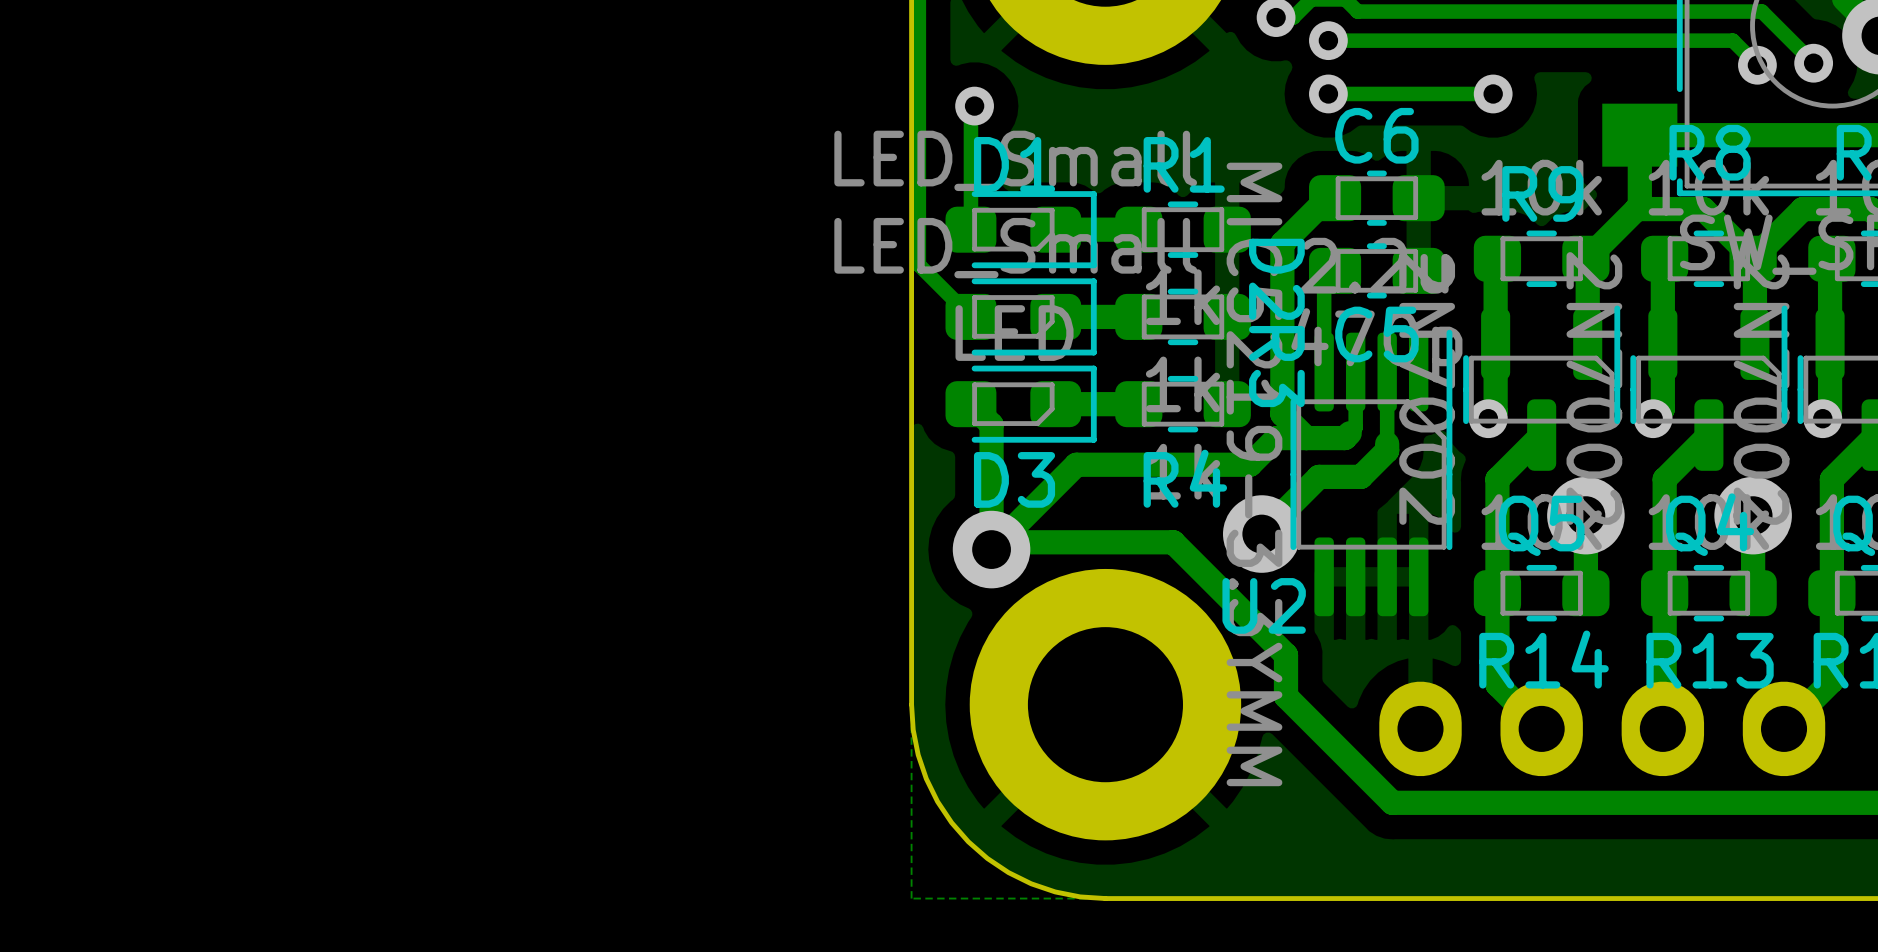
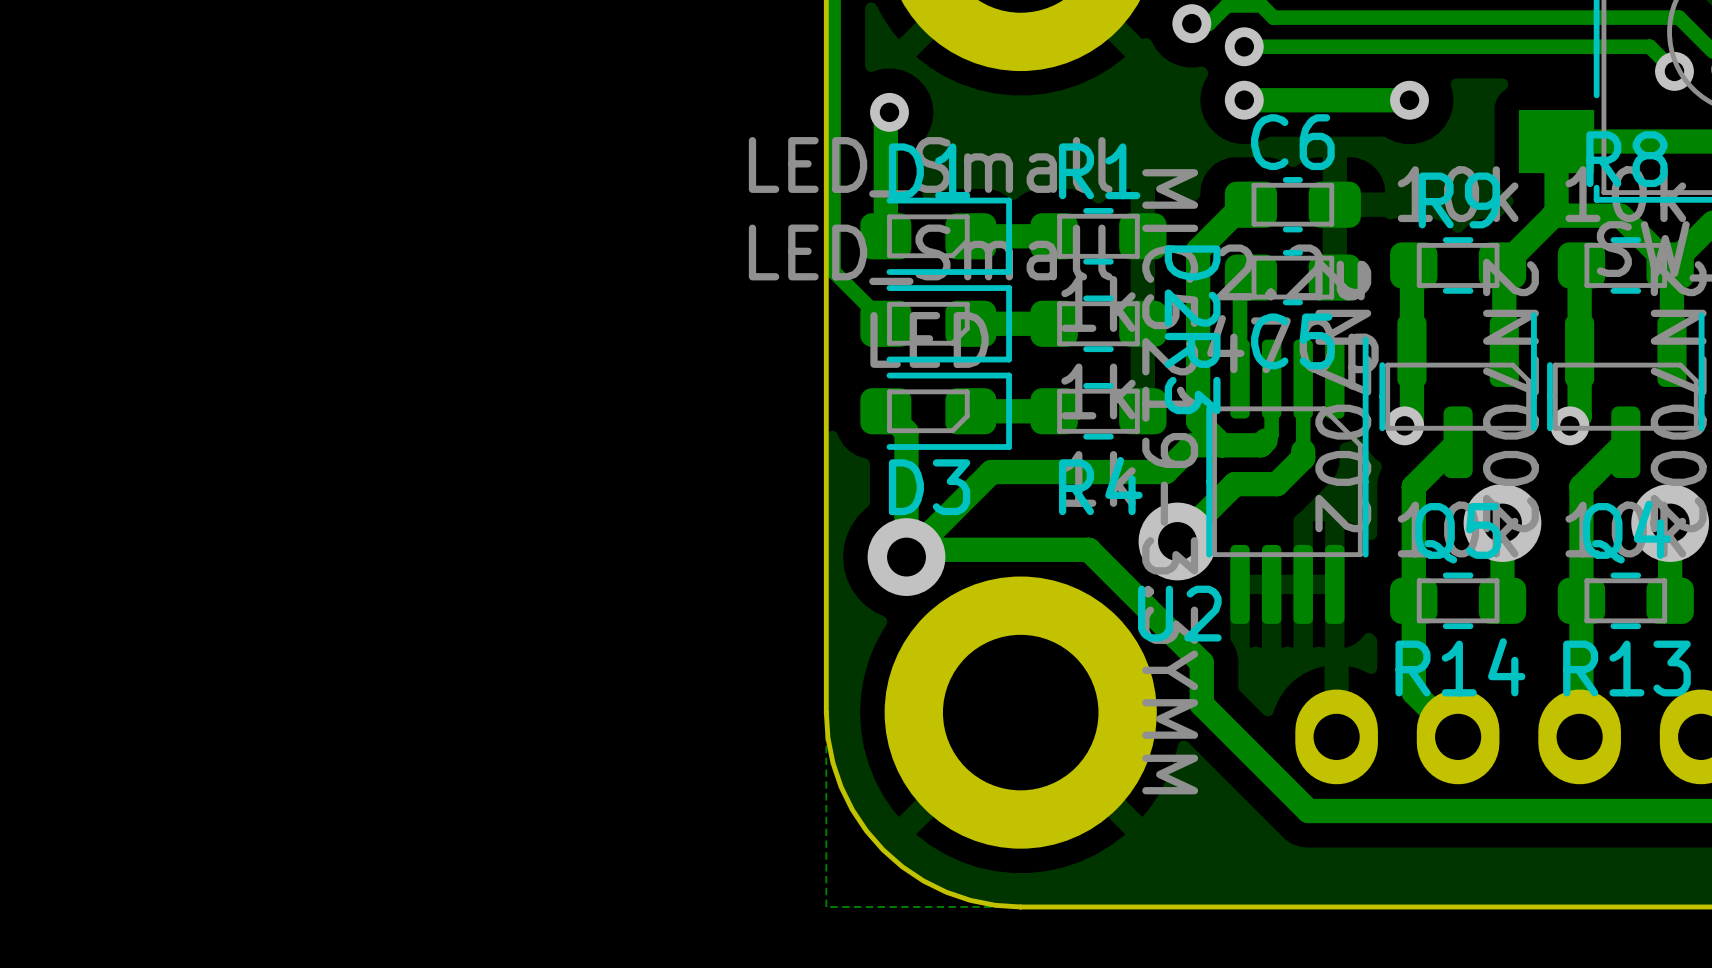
track width: thin (1493, 93) (1328, 93) -> thick (1409, 100) (1244, 100)
track width: thin (974, 106) (970, 109) (970, 229) -> thick (889, 112) (885, 116) (885, 236)

